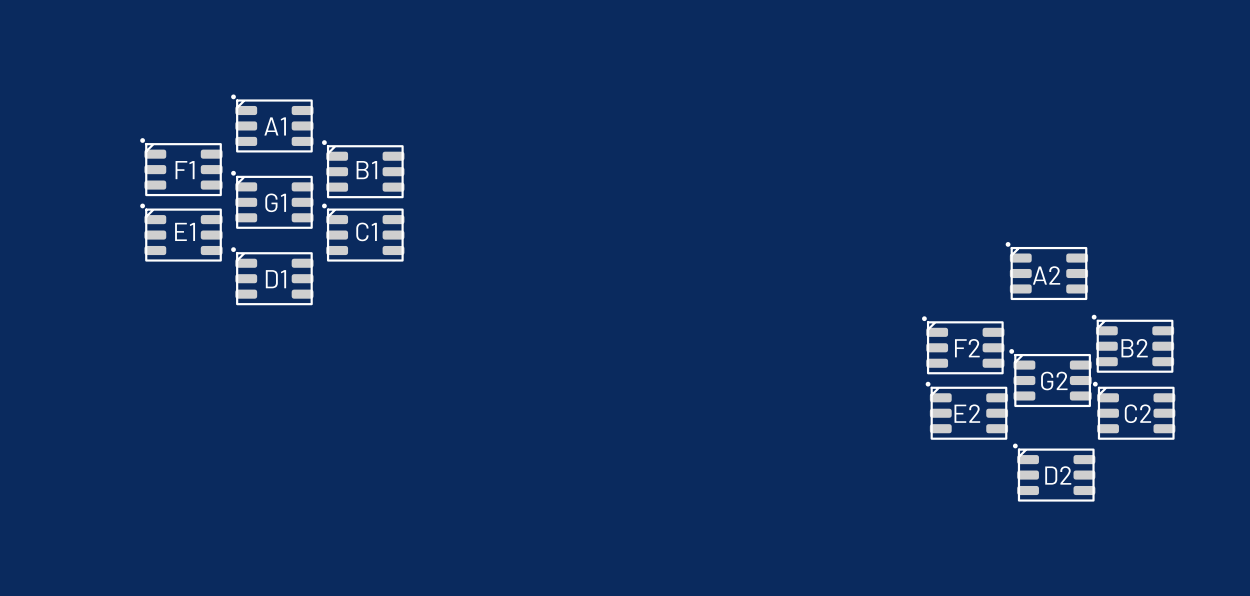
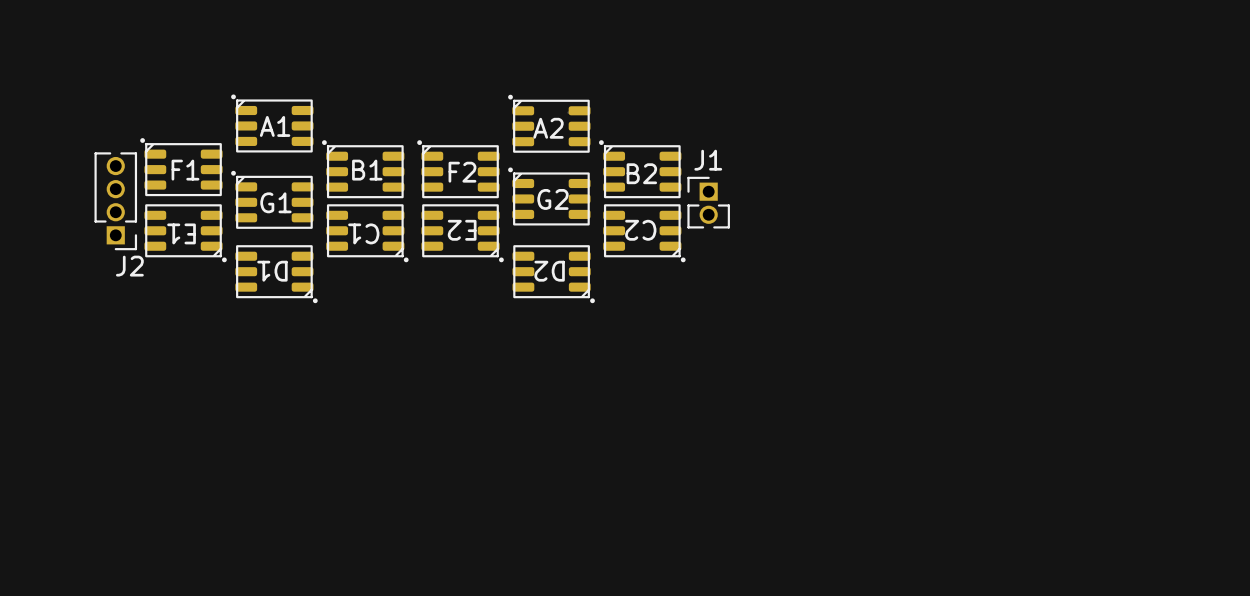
J2: none -> (115, 201)
J1: none -> (708, 202)
E1 rotation: 0° (181, 232) -> 180° (185, 233)
C1 rotation: 0° (363, 232) -> 180° (367, 233)
A2 position: (1046, 271) -> (549, 123)
D1 rotation: 0° (272, 276) -> 180° (276, 274)
B2 position: (1132, 343) -> (640, 169)
F2 position: (963, 345) -> (458, 169)
G2 position: (1050, 378) -> (549, 196)
E2 rotation: 0° (966, 410) -> 180° (462, 233)
E2 position: (966, 410) -> (462, 233)
C2 rotation: 0° (1134, 410) -> 180° (644, 233)
C2 position: (1134, 410) -> (644, 233)
D2 rotation: 0° (1054, 472) -> 180° (553, 274)
D2 position: (1054, 472) -> (553, 274)

